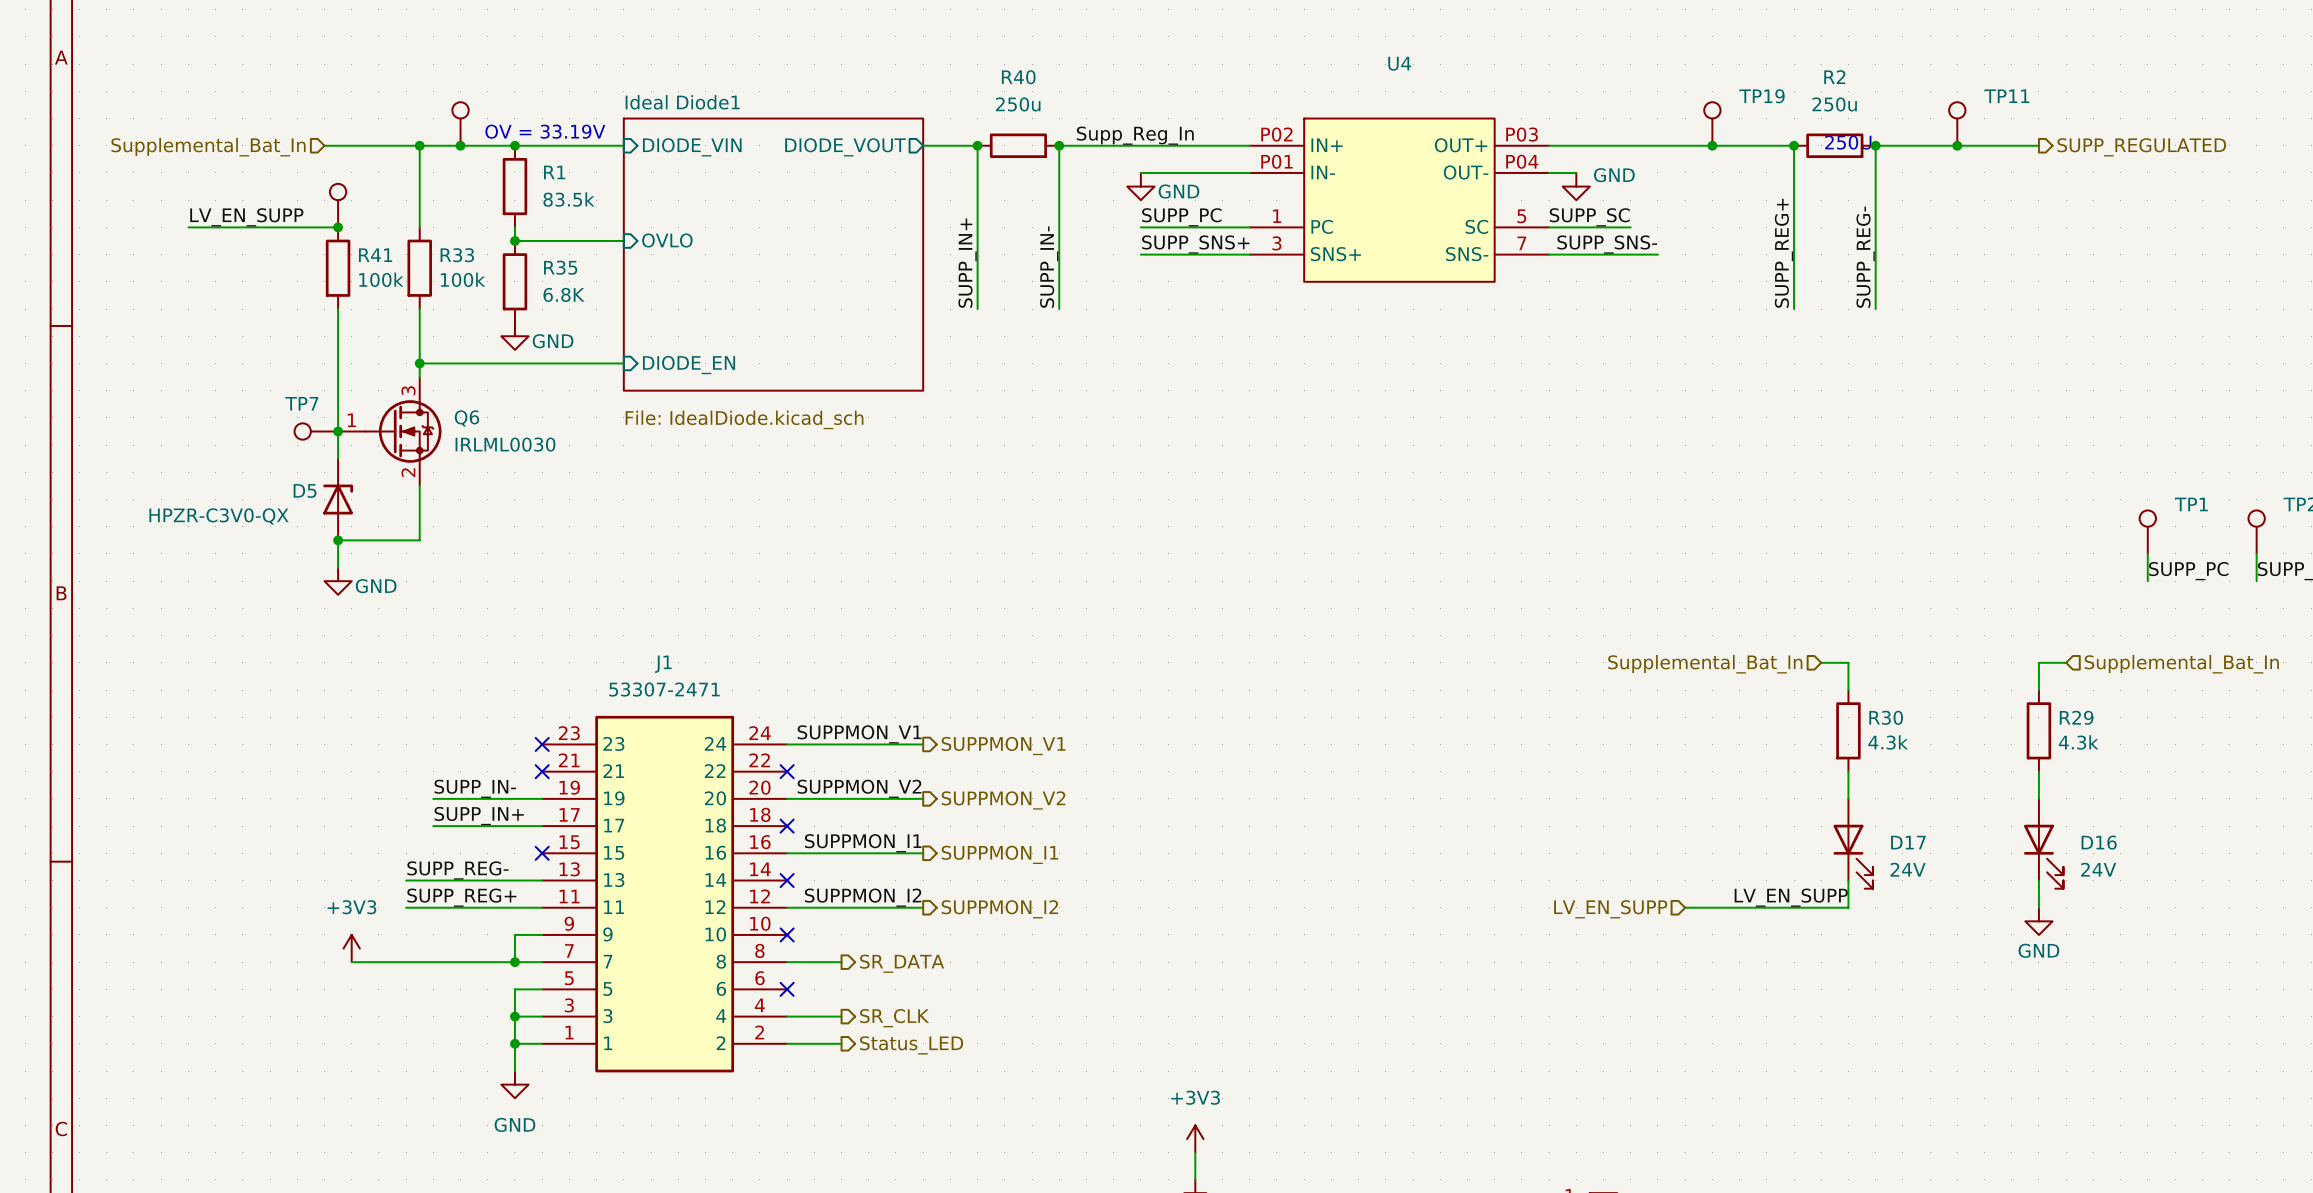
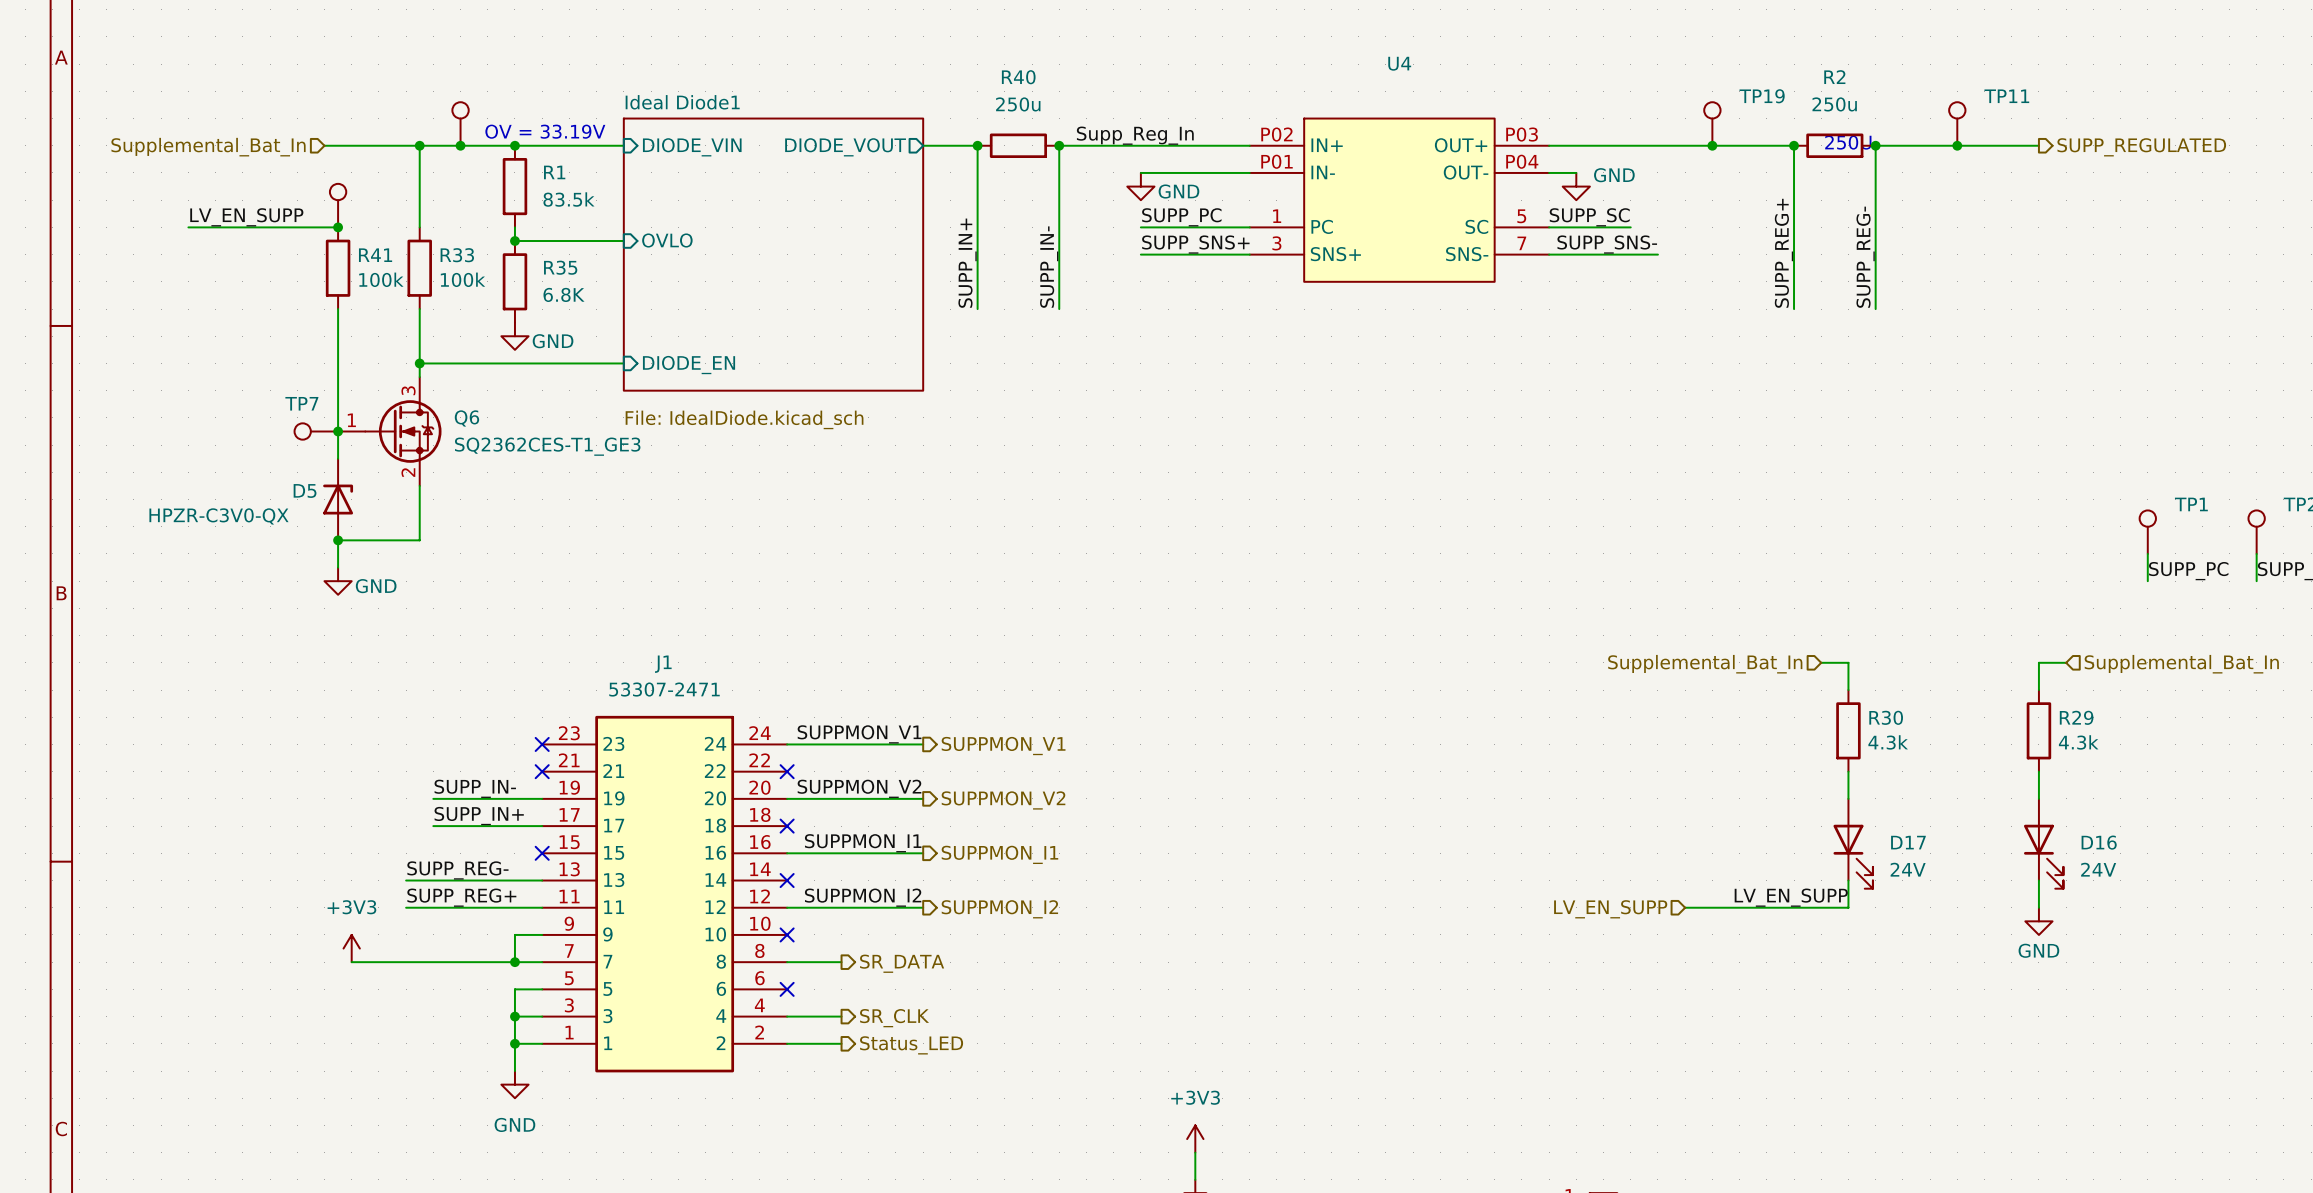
Q6 value: IRLML0030 (505, 444) -> SQ2362CES-T1_GE3 (547, 446)

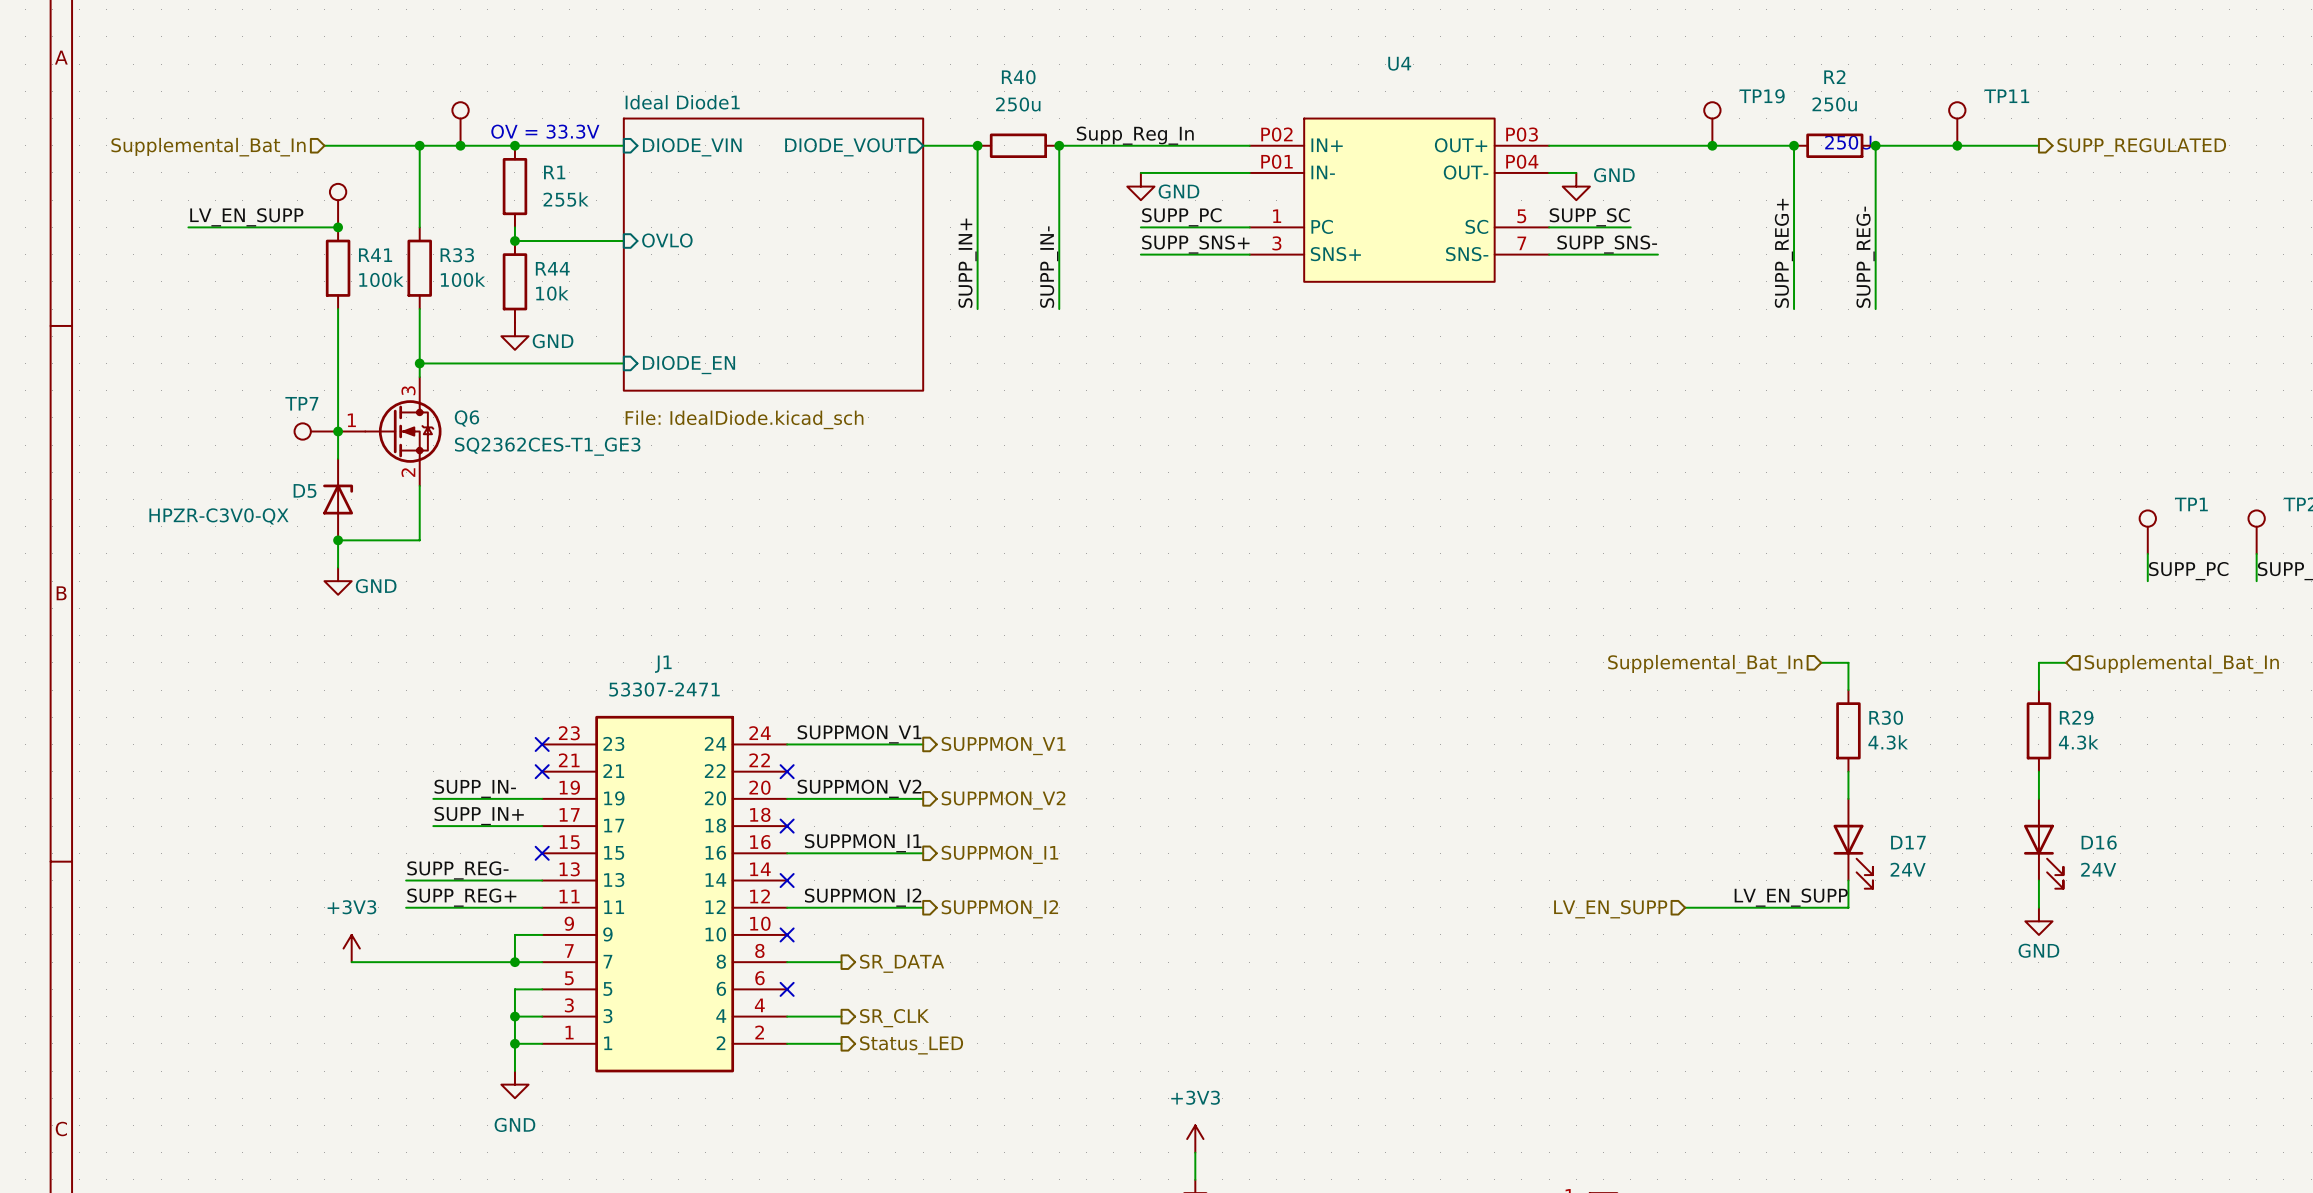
text: OV = 33.19V (545, 131) -> OV = 33.3V (545, 131)
R1 value: 83.5k (568, 199) -> 255k (566, 199)
R35 name: R35 (560, 267) -> R44 (552, 268)
R35 value: 6.8K (563, 294) -> 10k (552, 293)

